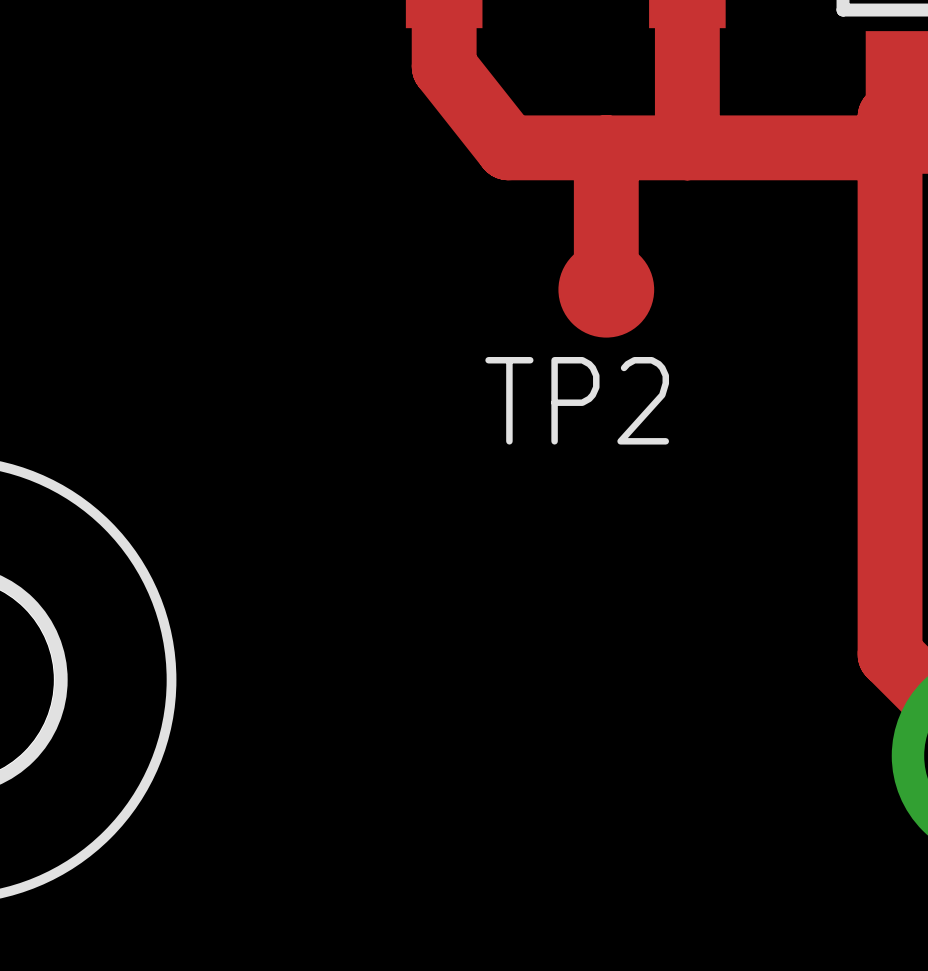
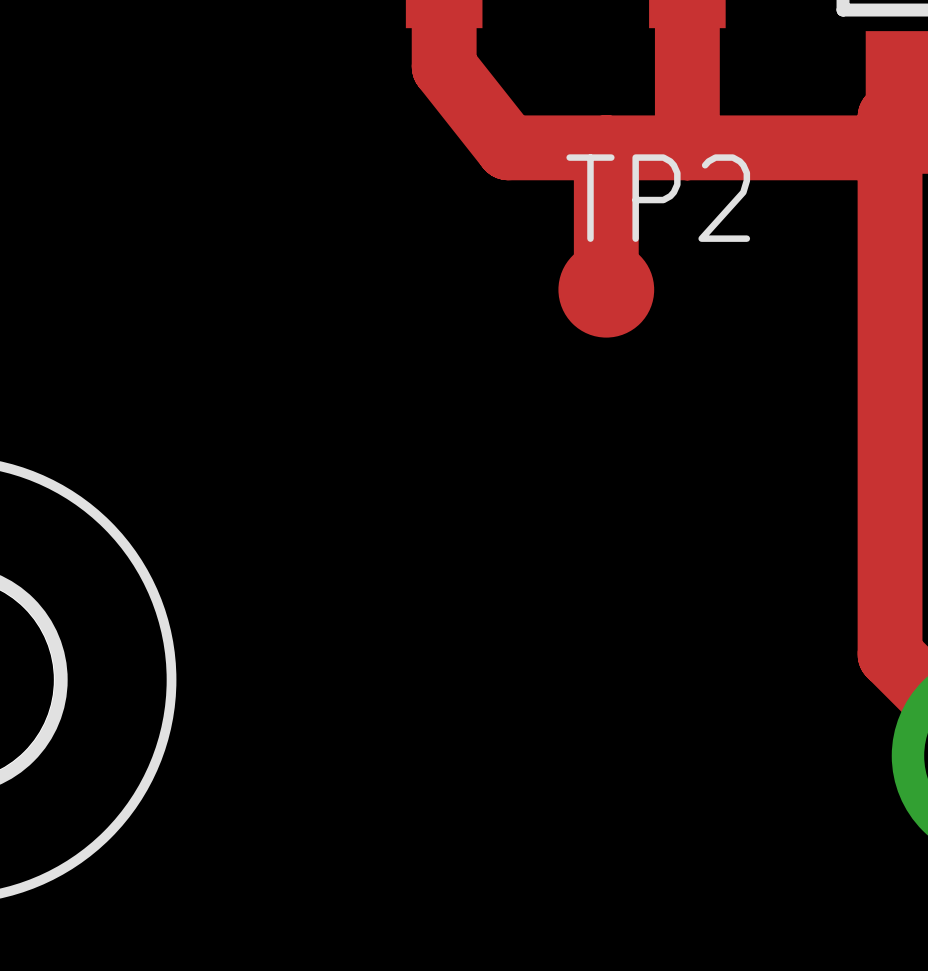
TP2 name position: TP2 (577, 400) -> TP2 (658, 198)

